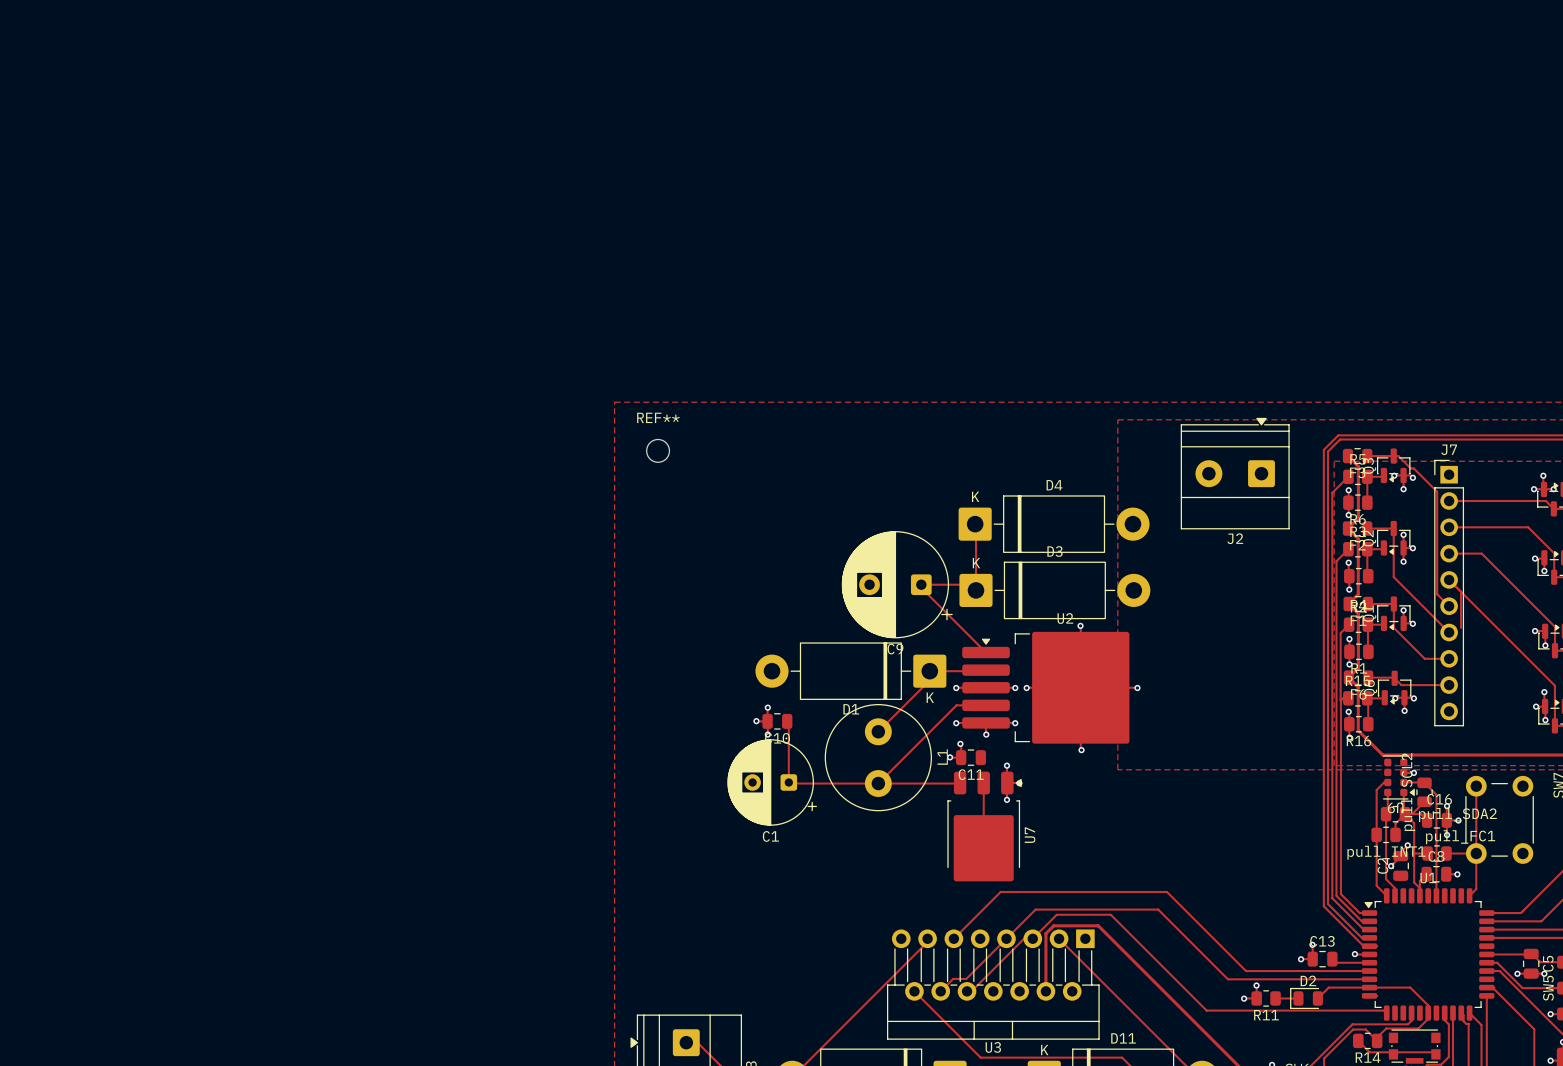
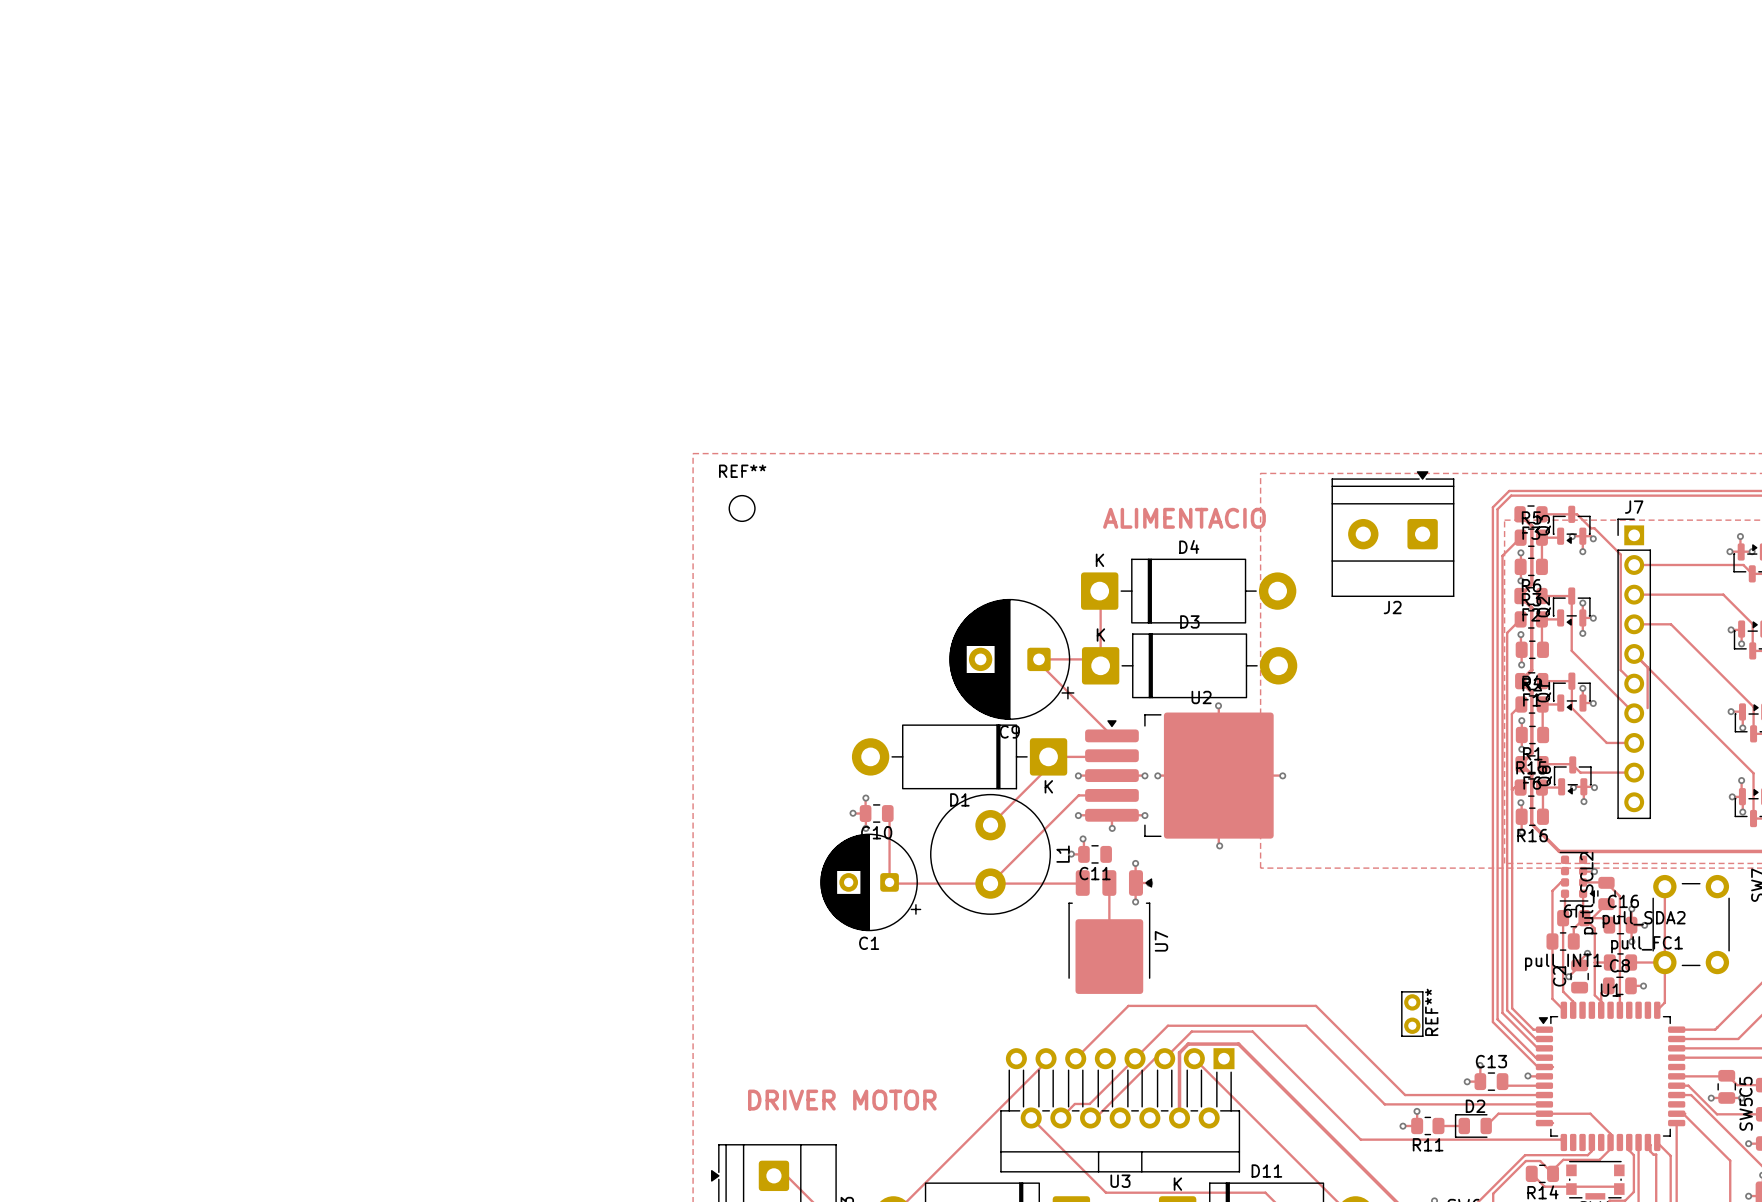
text: none -> ALIMENTACIO (1184, 518)
REF**: none -> (1412, 1014)
text: none -> DRIVER MOTOR (842, 1100)

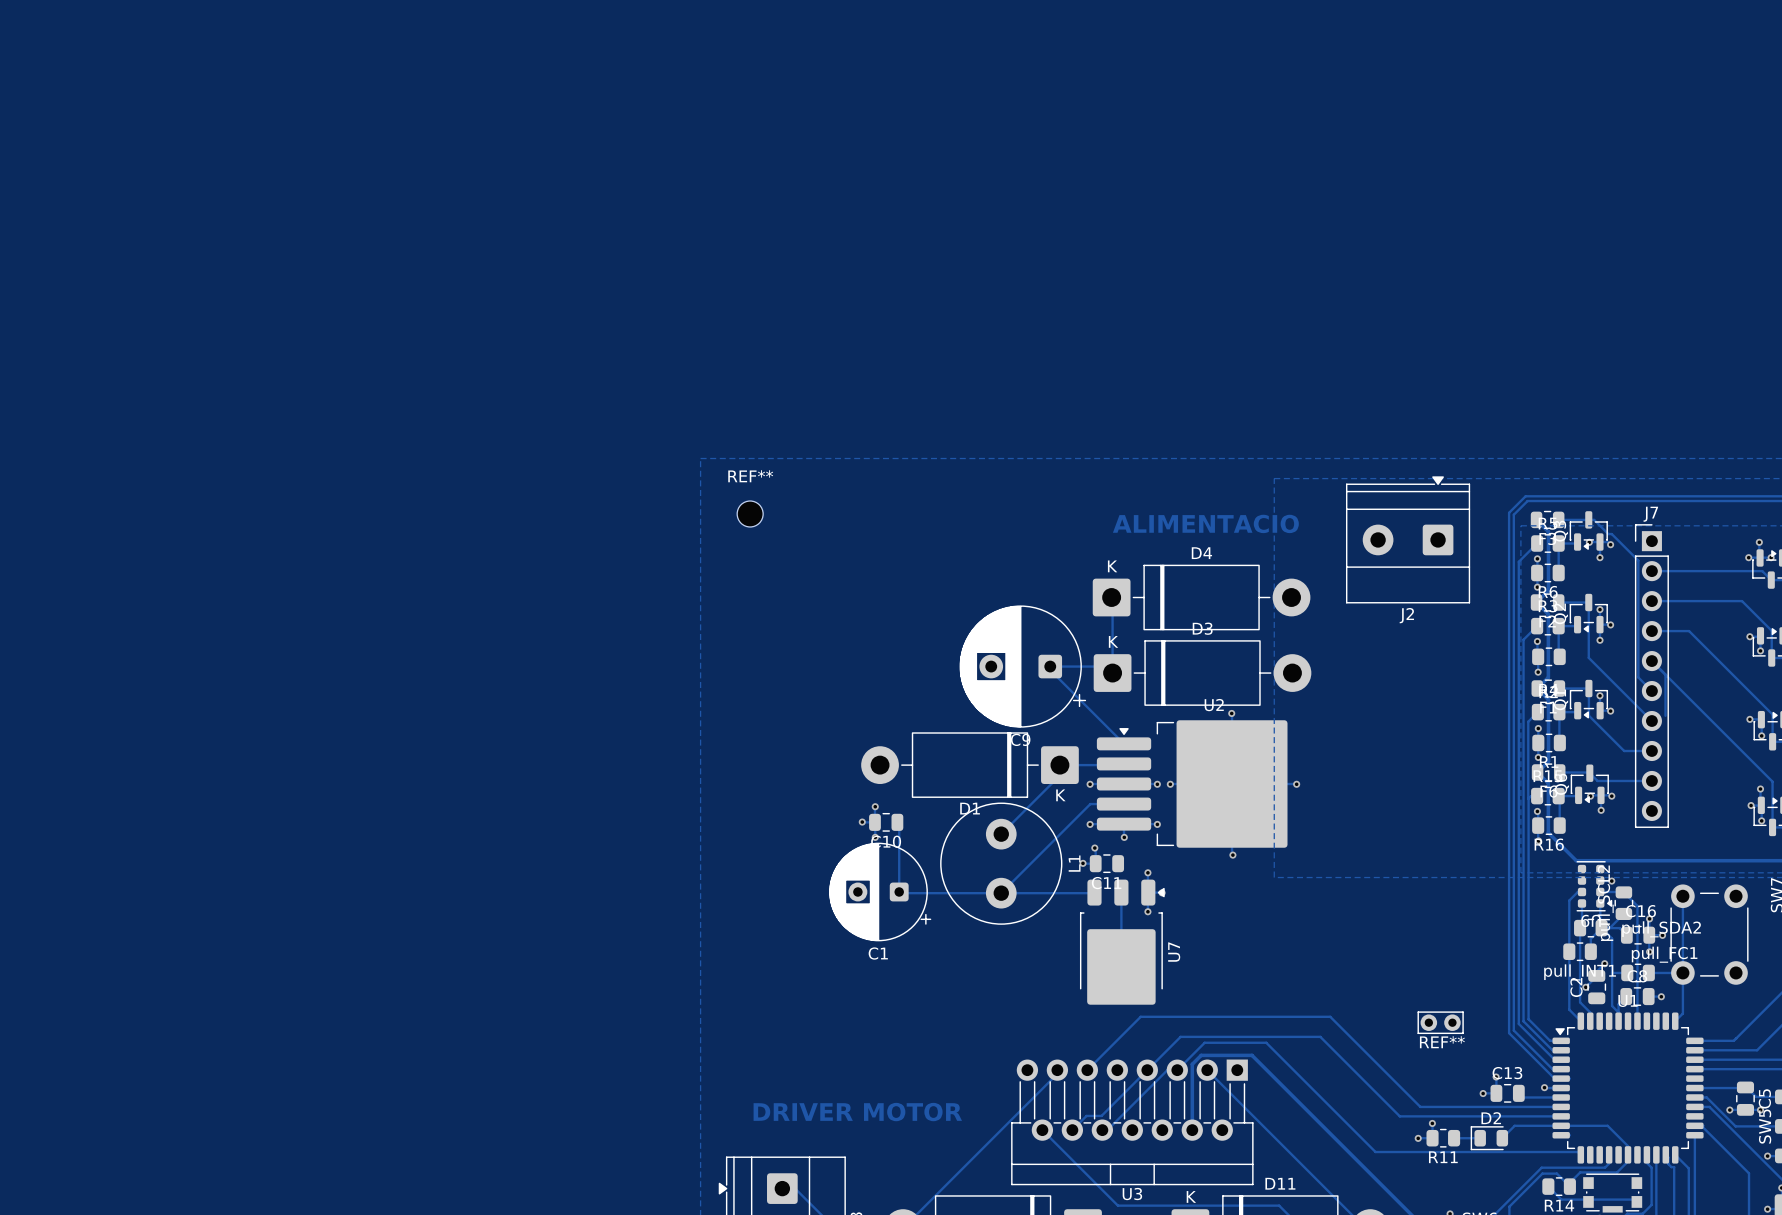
REF** rotation: 0° (1412, 1014) -> 90° clockwise (1440, 1022)

